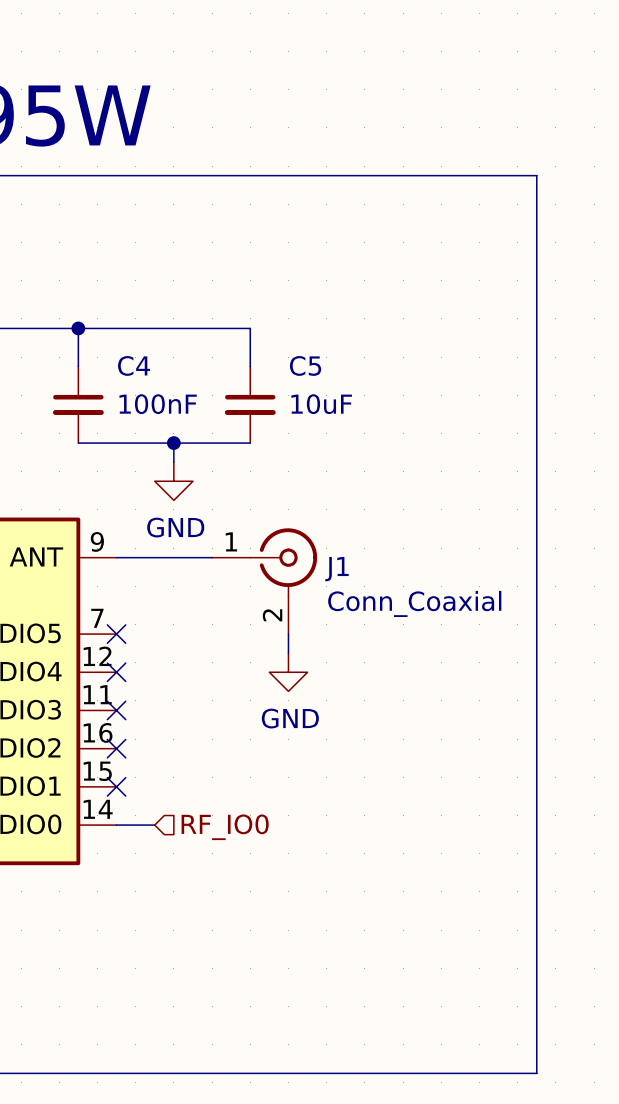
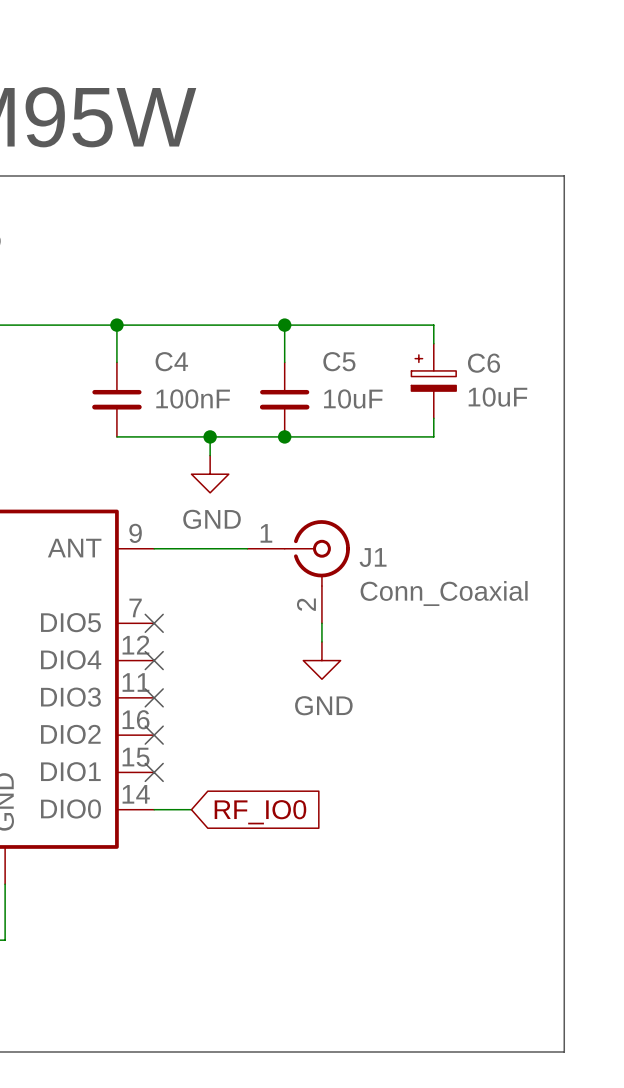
wire: none -> (284, 325) (433, 325) (433, 343)
junction: none -> (284, 325)
C6: none -> 10uF (433, 381)
wire: none -> (433, 418) (433, 436) (284, 436)
junction: none -> (284, 436)
global label: none -> RF_IO0 (260, 812)
hierarchical label: RF_IO0 (225, 827) -> none

